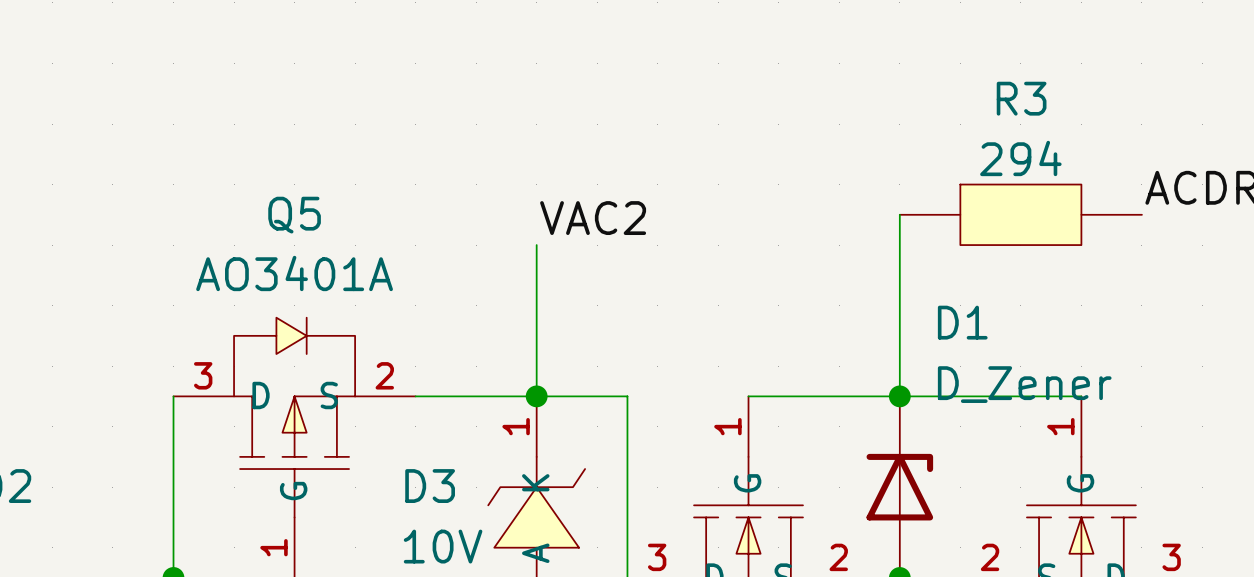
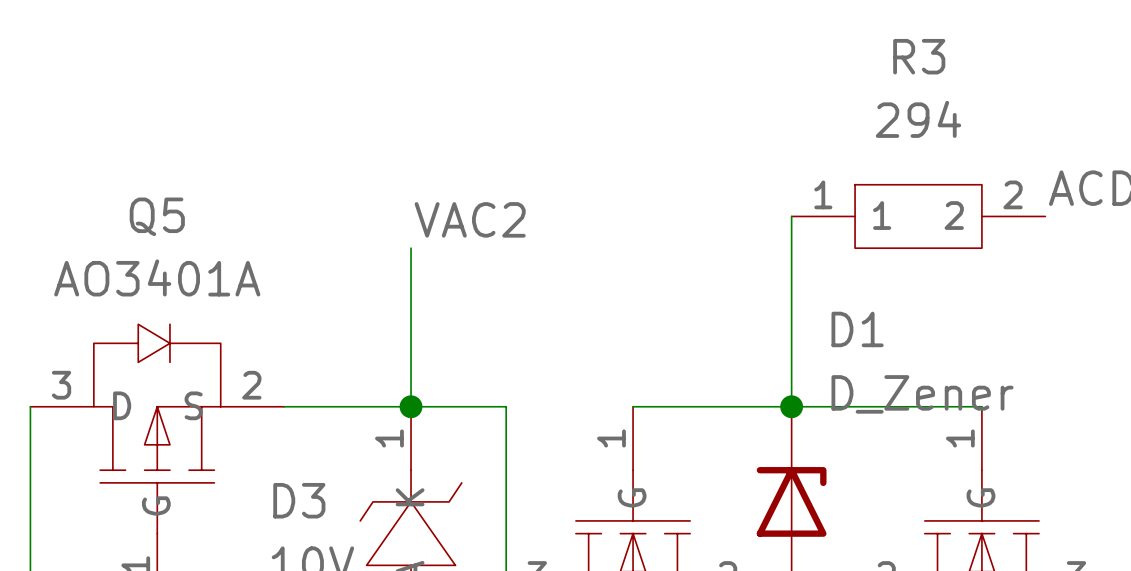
R3 name position: R3 (1021, 98) -> R3 (919, 56)
R3 value position: 294 (1020, 158) -> 294 (918, 119)
R3 pin number: none -> 1 (823, 194)
R3 pin number: none -> 2 (1013, 194)
R3 pin name: none -> 1 (882, 215)
R3 pin name: none -> 2 (954, 215)

